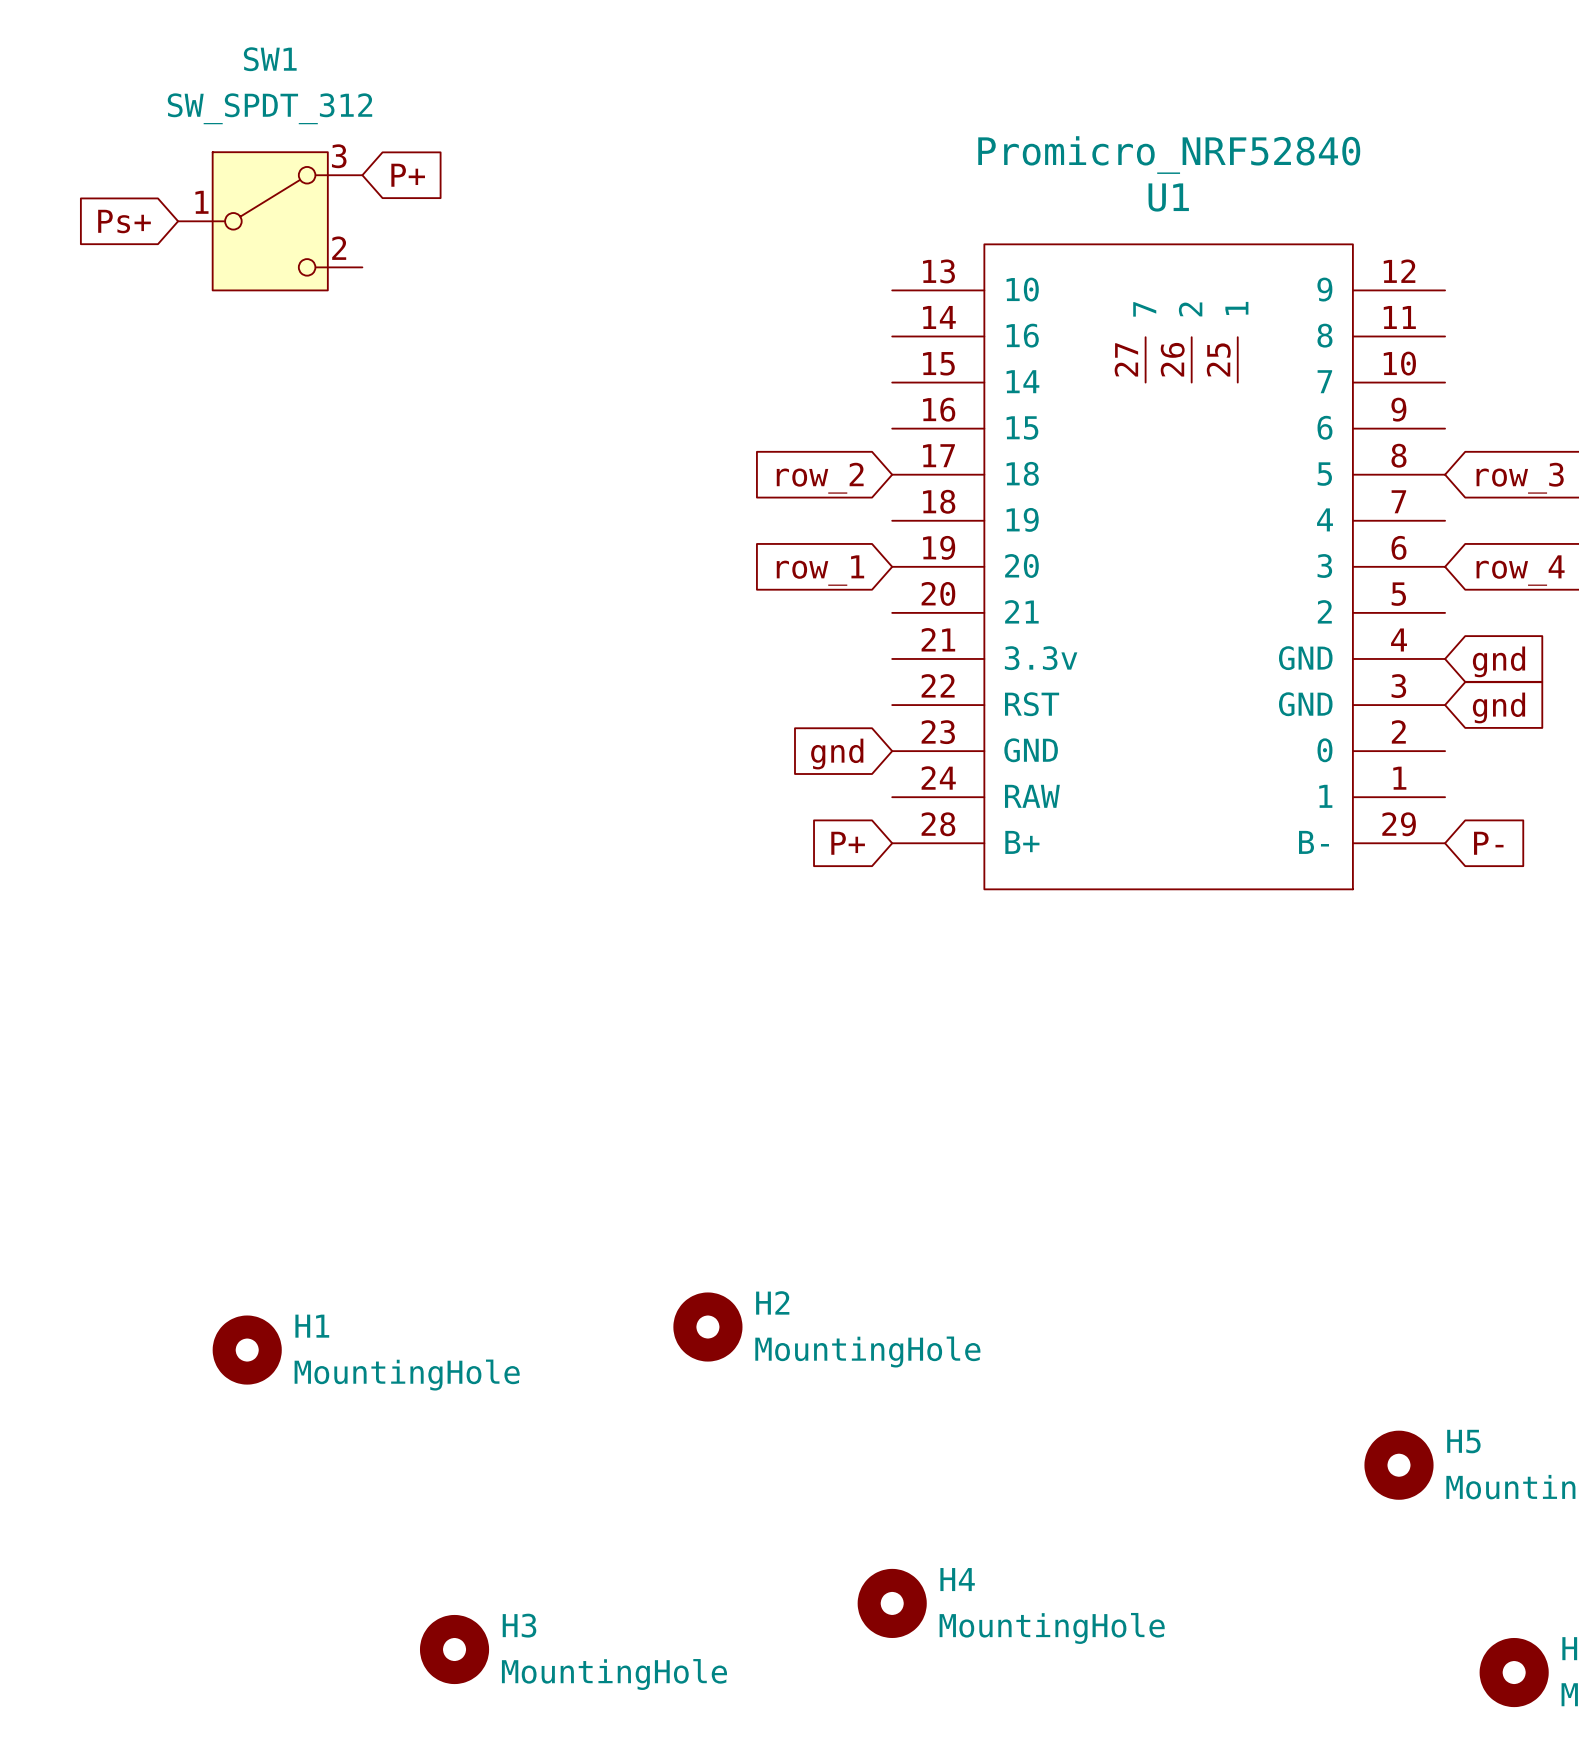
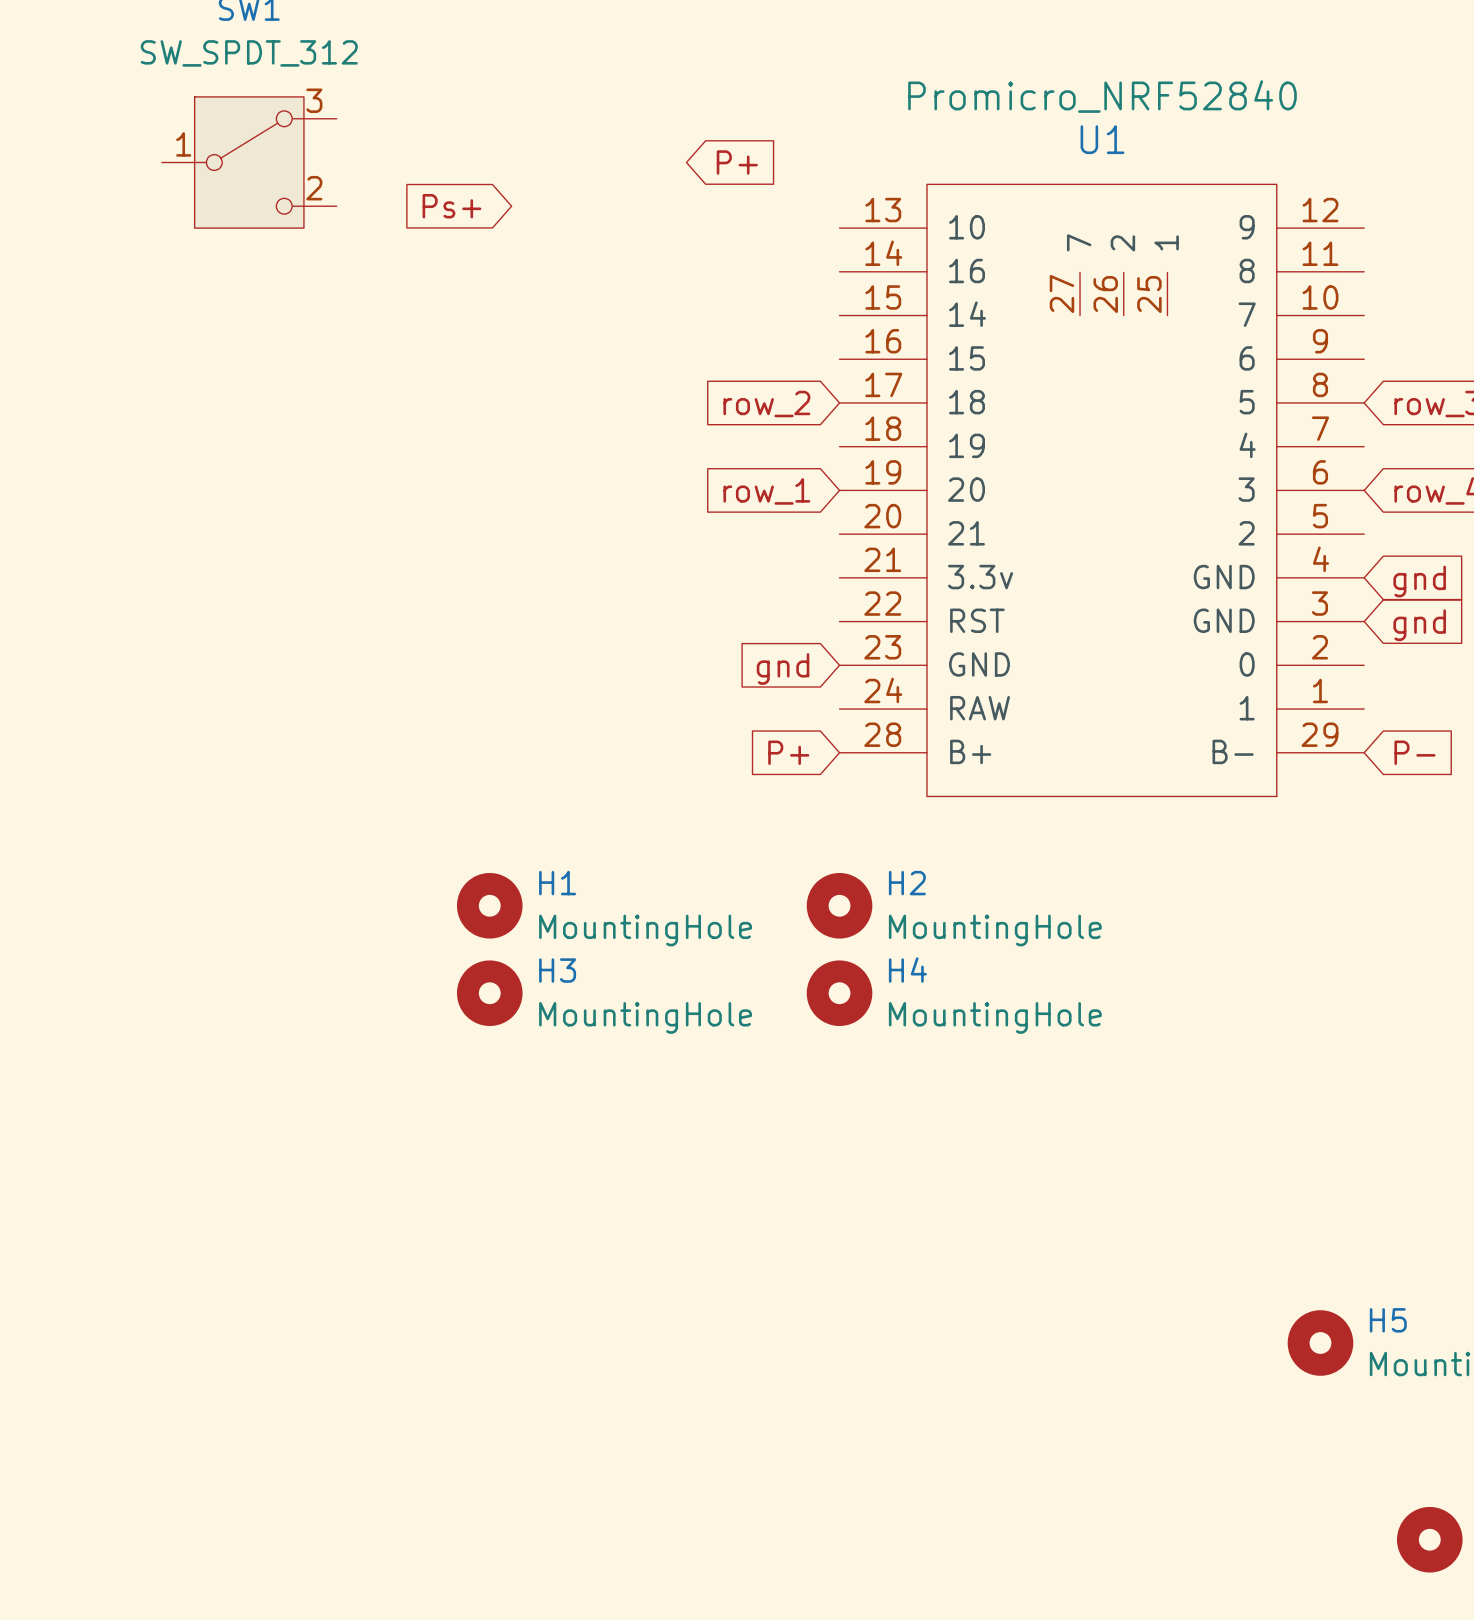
global label position: P+ (408, 175) -> P+ (737, 162)
global label: Ps+ (124, 221) -> none
global label: none -> Ps+ (451, 206)
H2 position: (707, 1327) -> (839, 905)
H1 position: (247, 1350) -> (489, 905)
H4 position: (892, 1603) -> (839, 993)
H3 position: (454, 1649) -> (489, 993)

